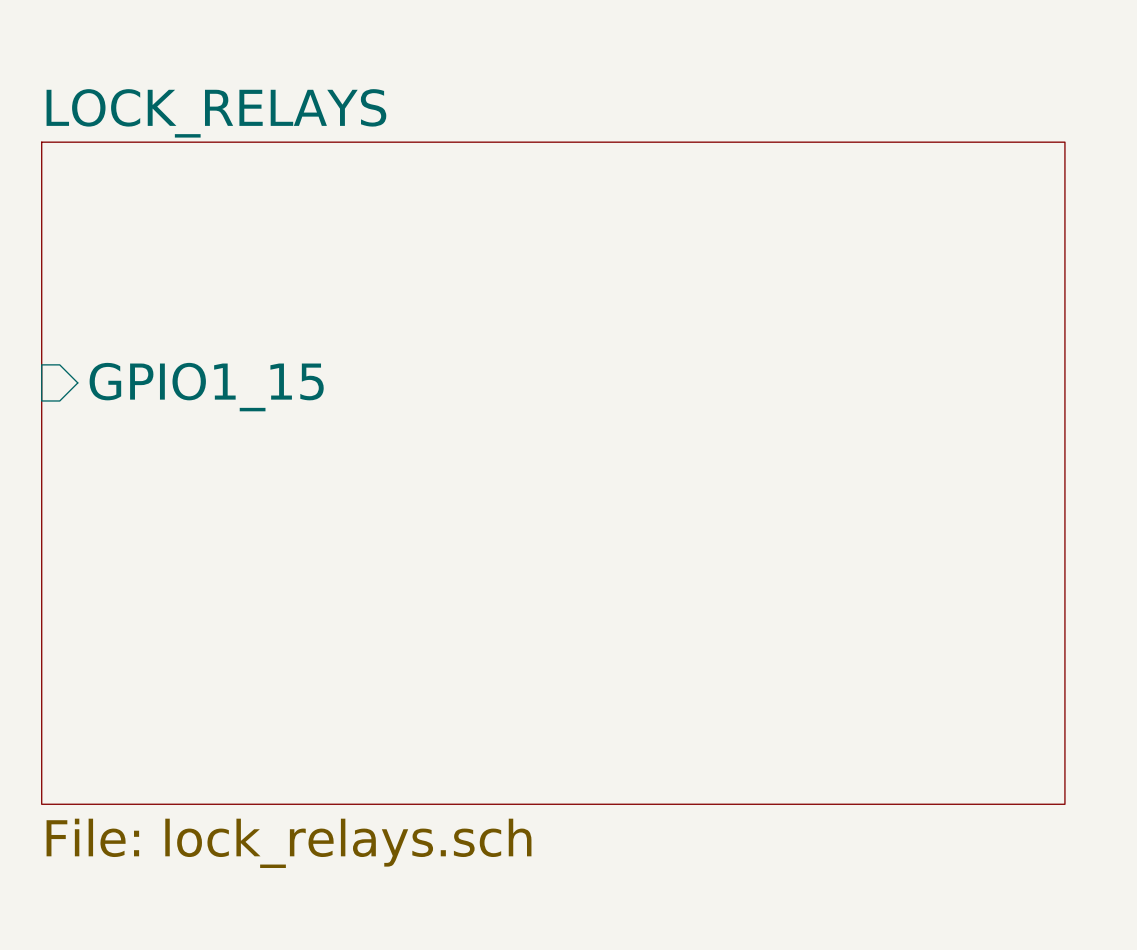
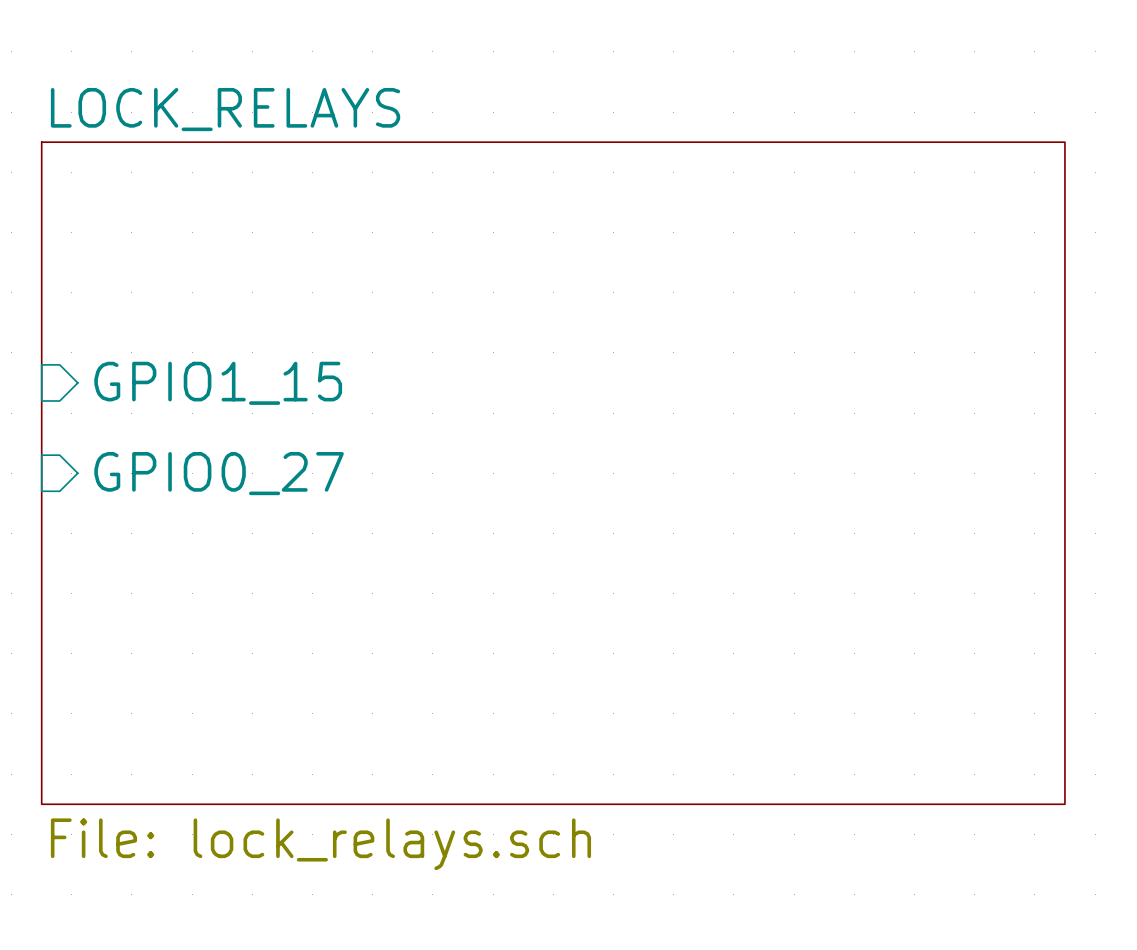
sheet pin: none -> GPIO0_27 (219, 473)

